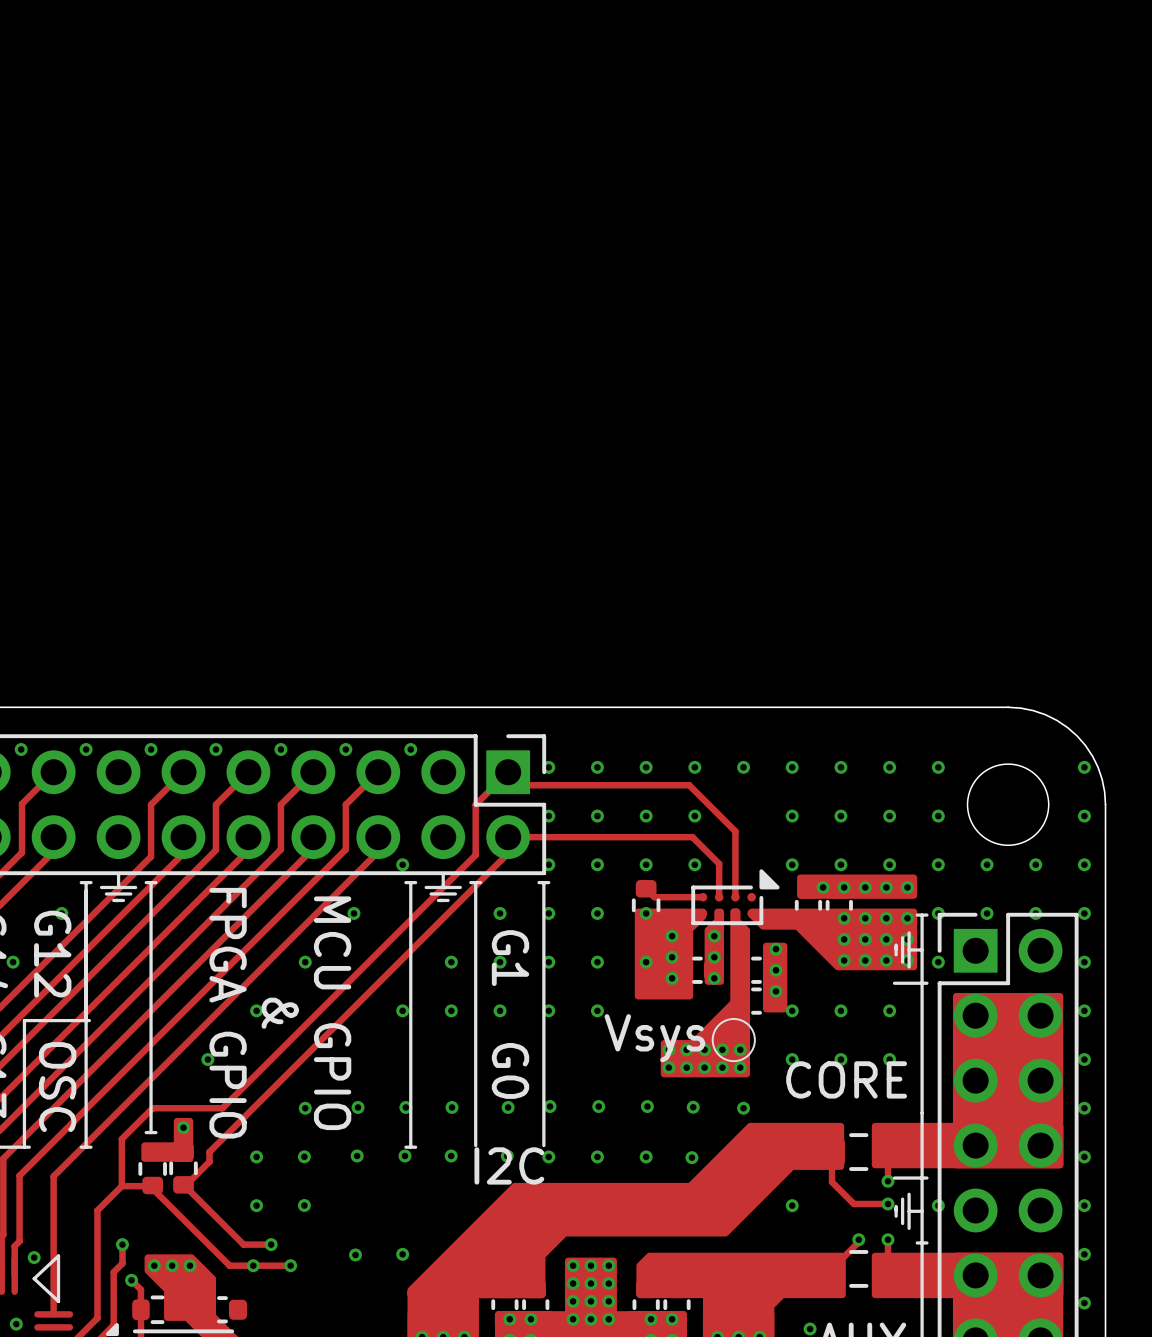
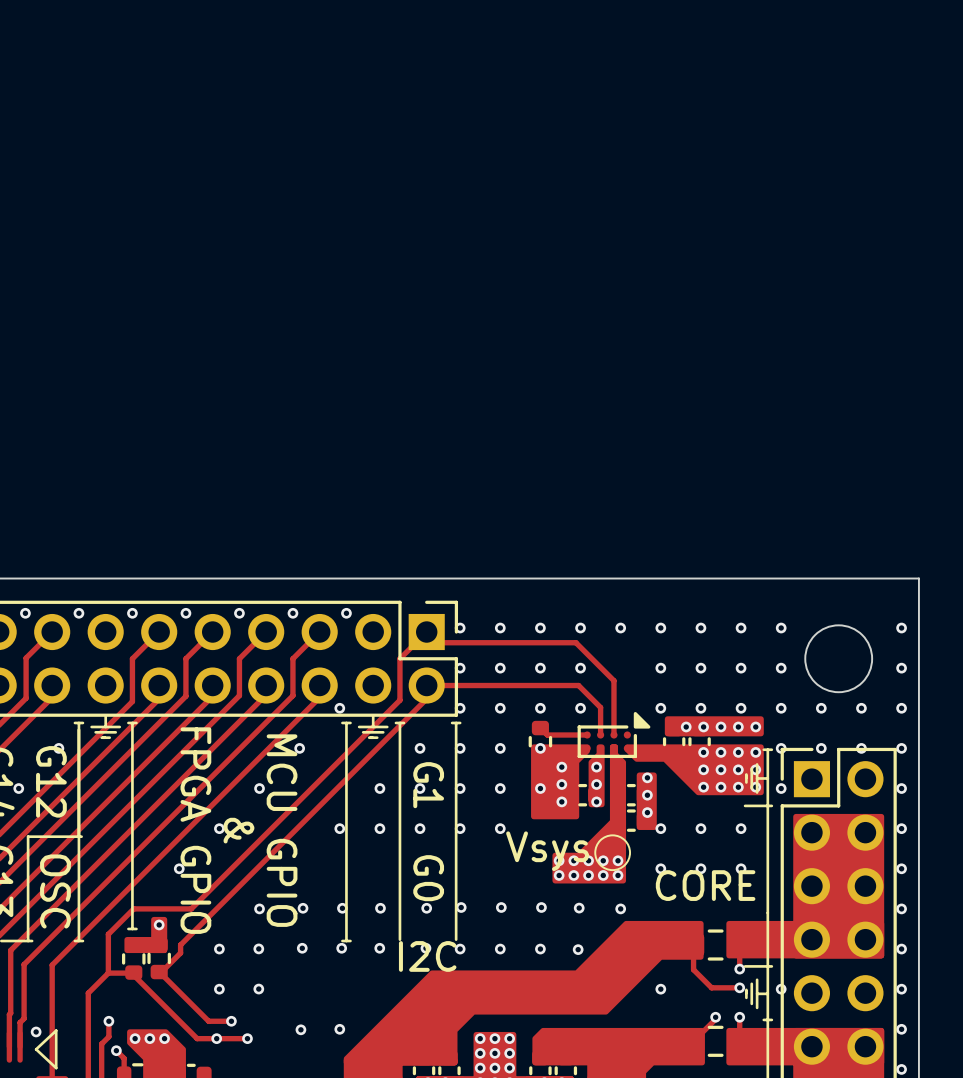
board edge: (1008, 707) (1033, 710) (1045, 714) (1067, 727) (1076, 735) (1085, 745) (1098, 767) (1104, 791) (1105, 804) -> (838, 578) (918, 578) (918, 658)

